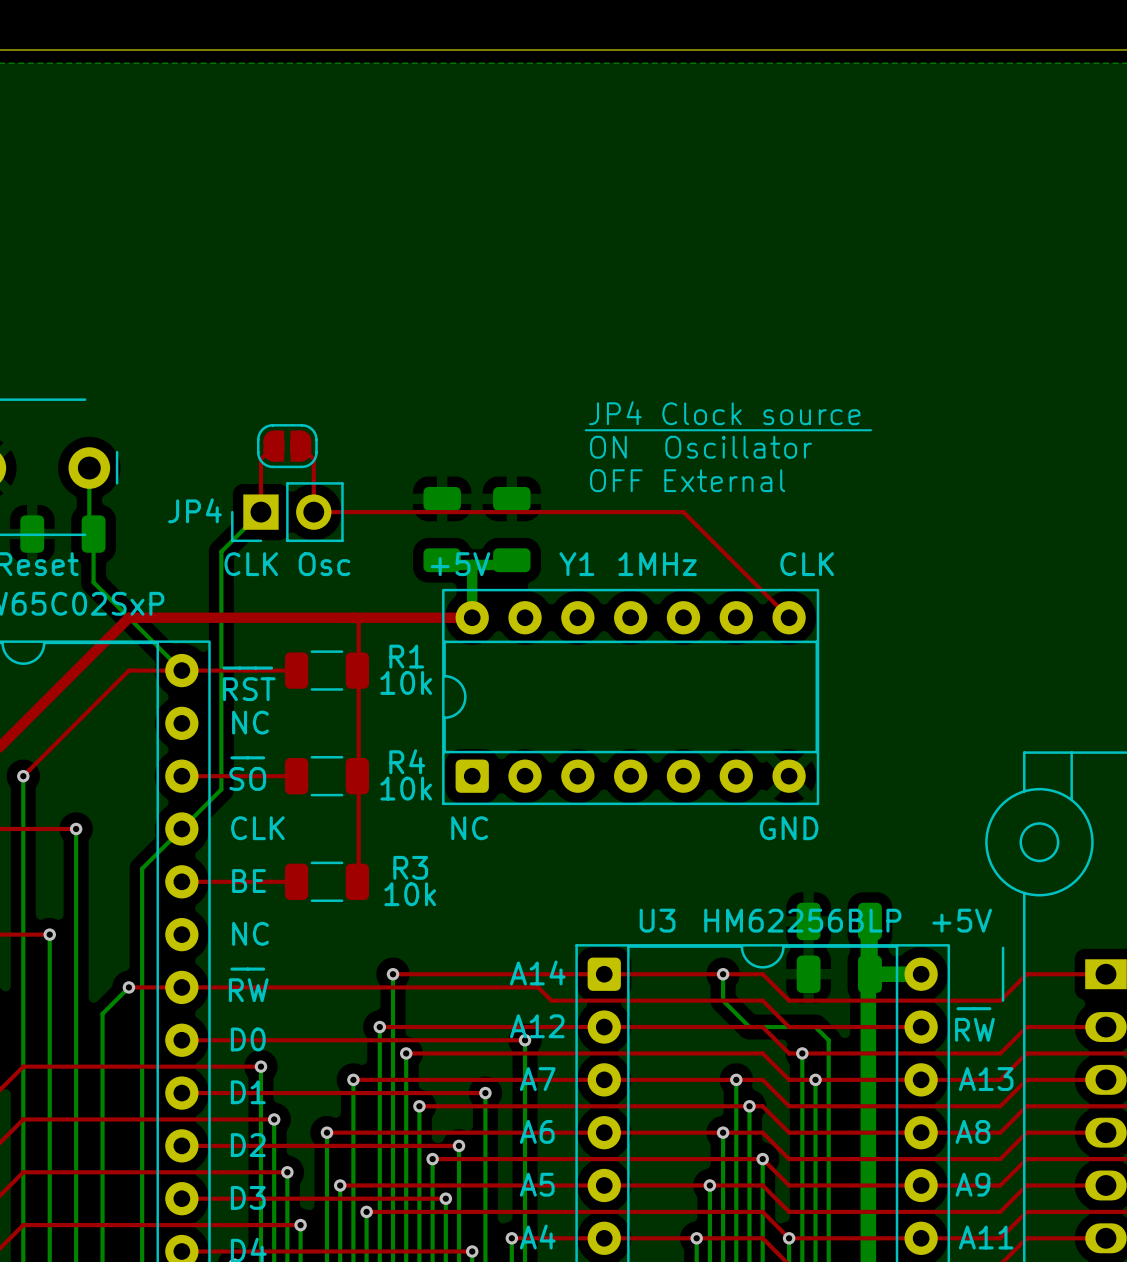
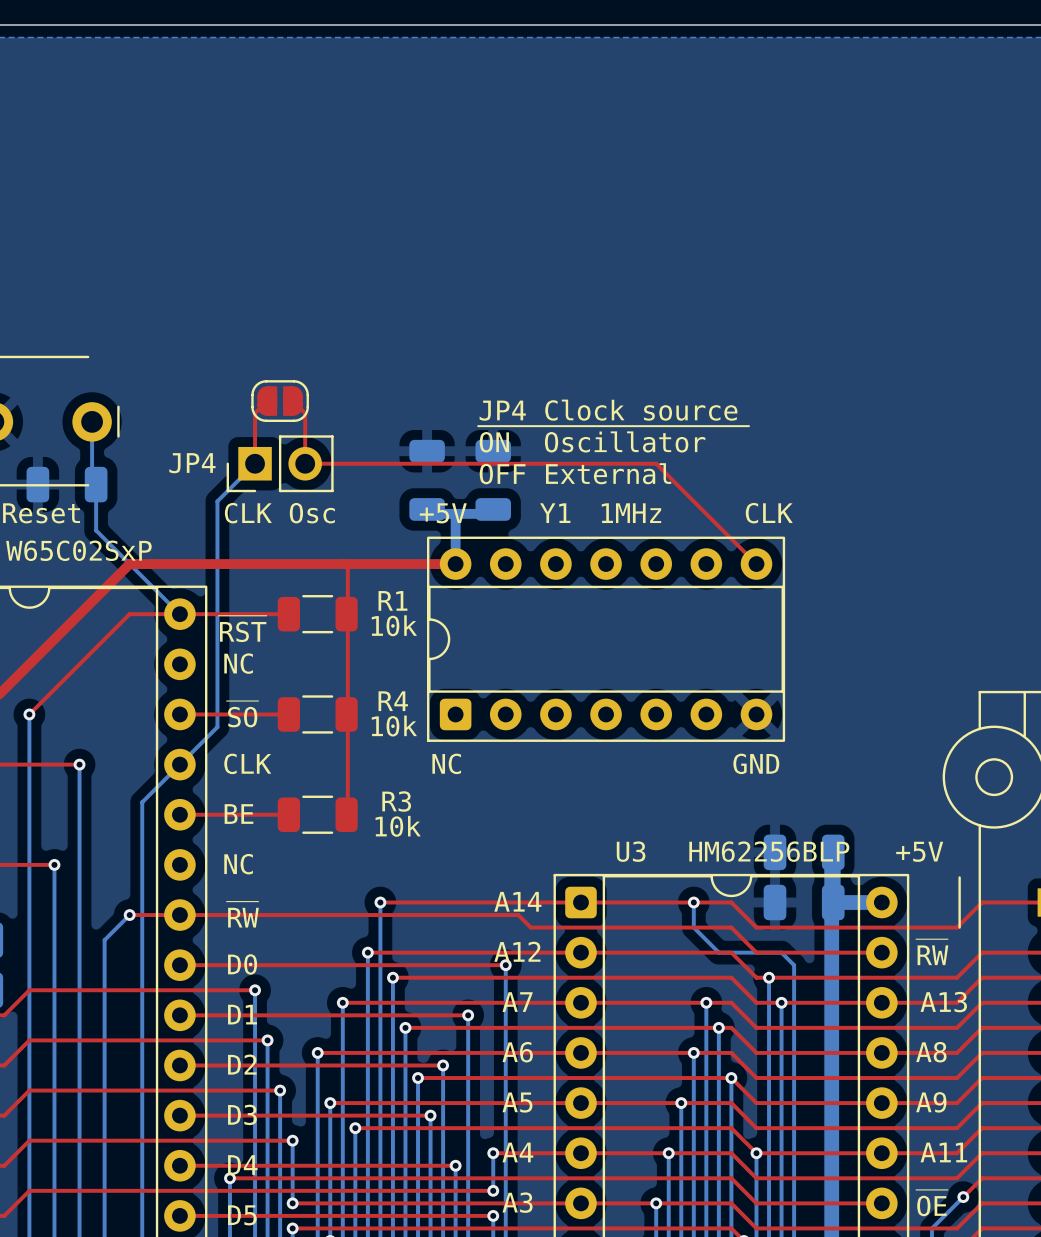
text position: JP4 Clock source (724, 413) -> JP4 Clock source (608, 410)
line: (585, 430) (870, 430) -> (478, 426) (748, 426)
text position: ON Oscillator (701, 447) -> ON Oscillator (592, 441)
text position: OFF External (687, 480) -> OFF External (575, 473)

